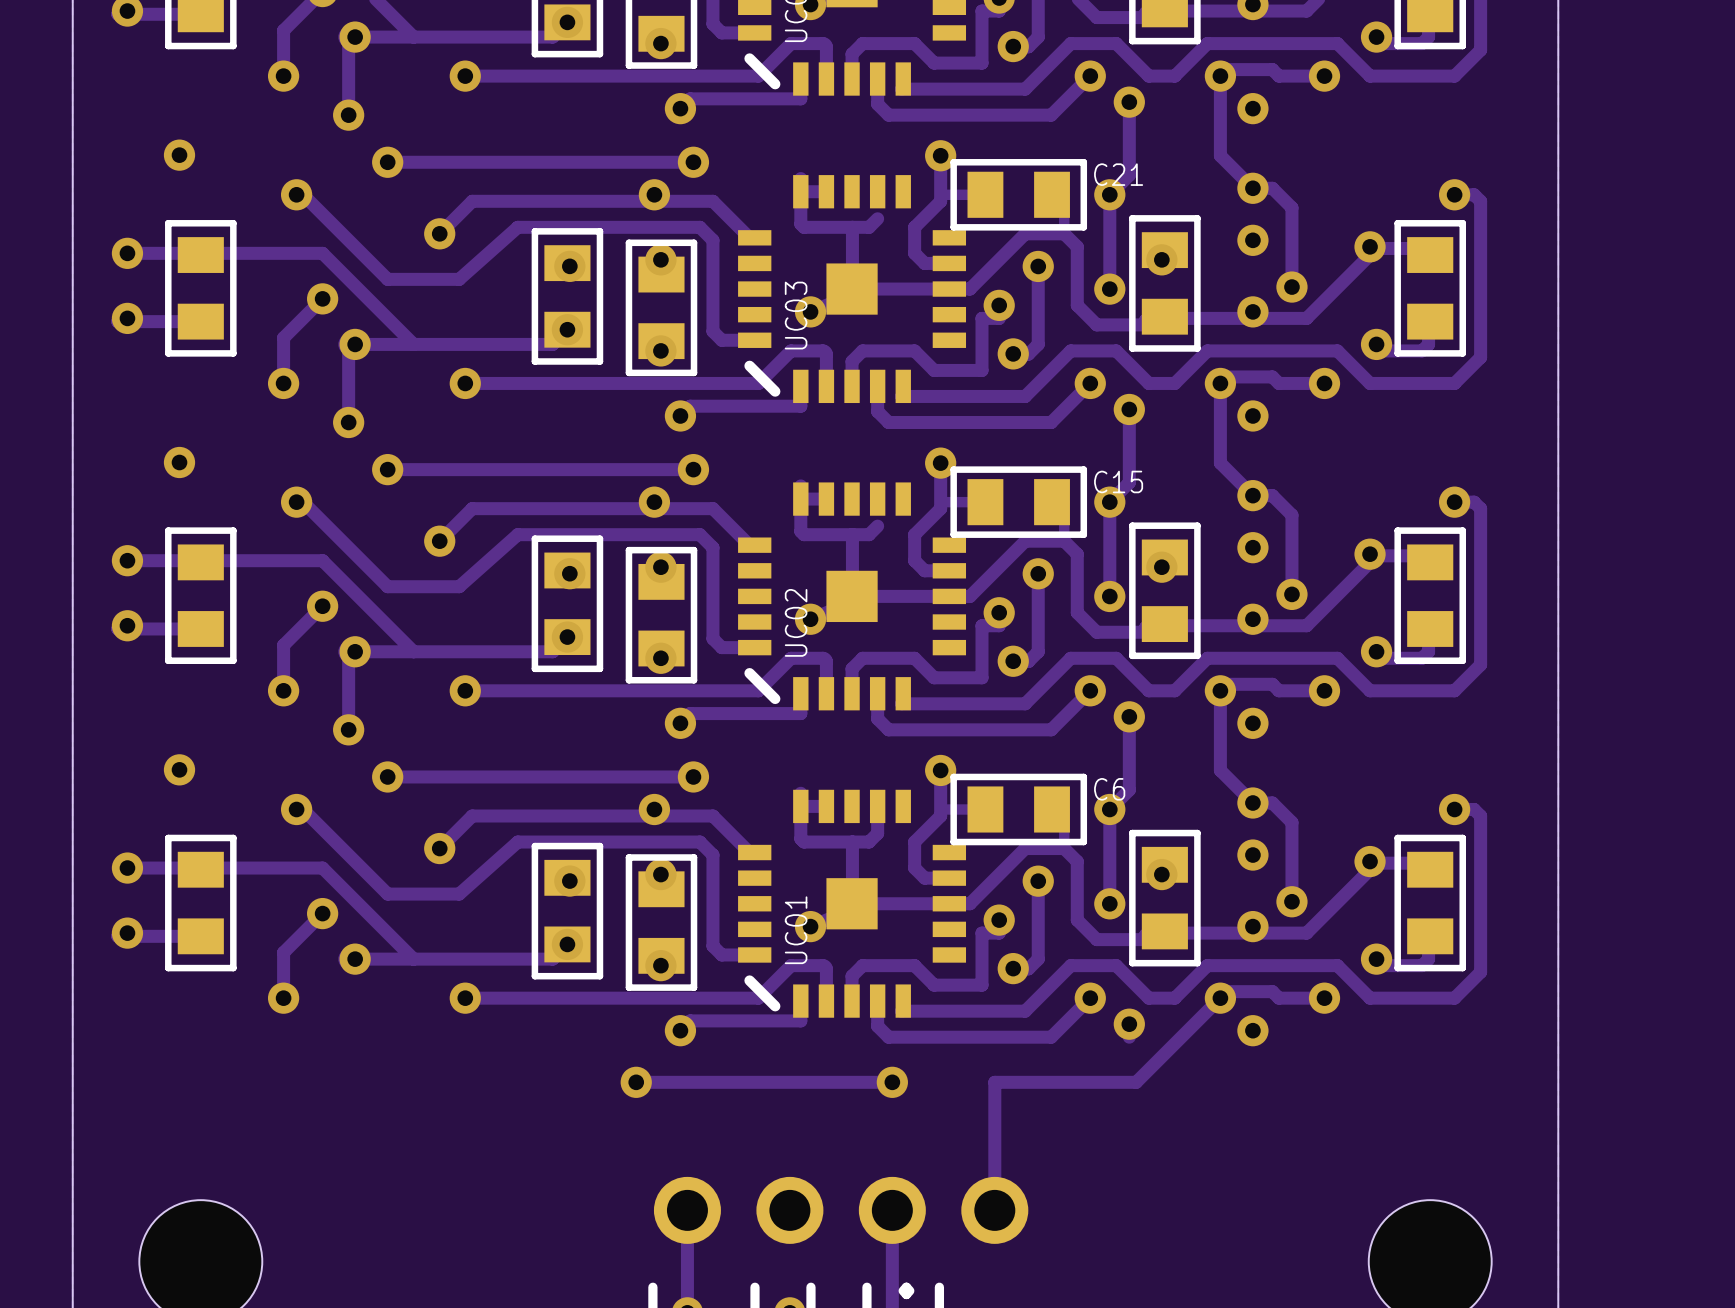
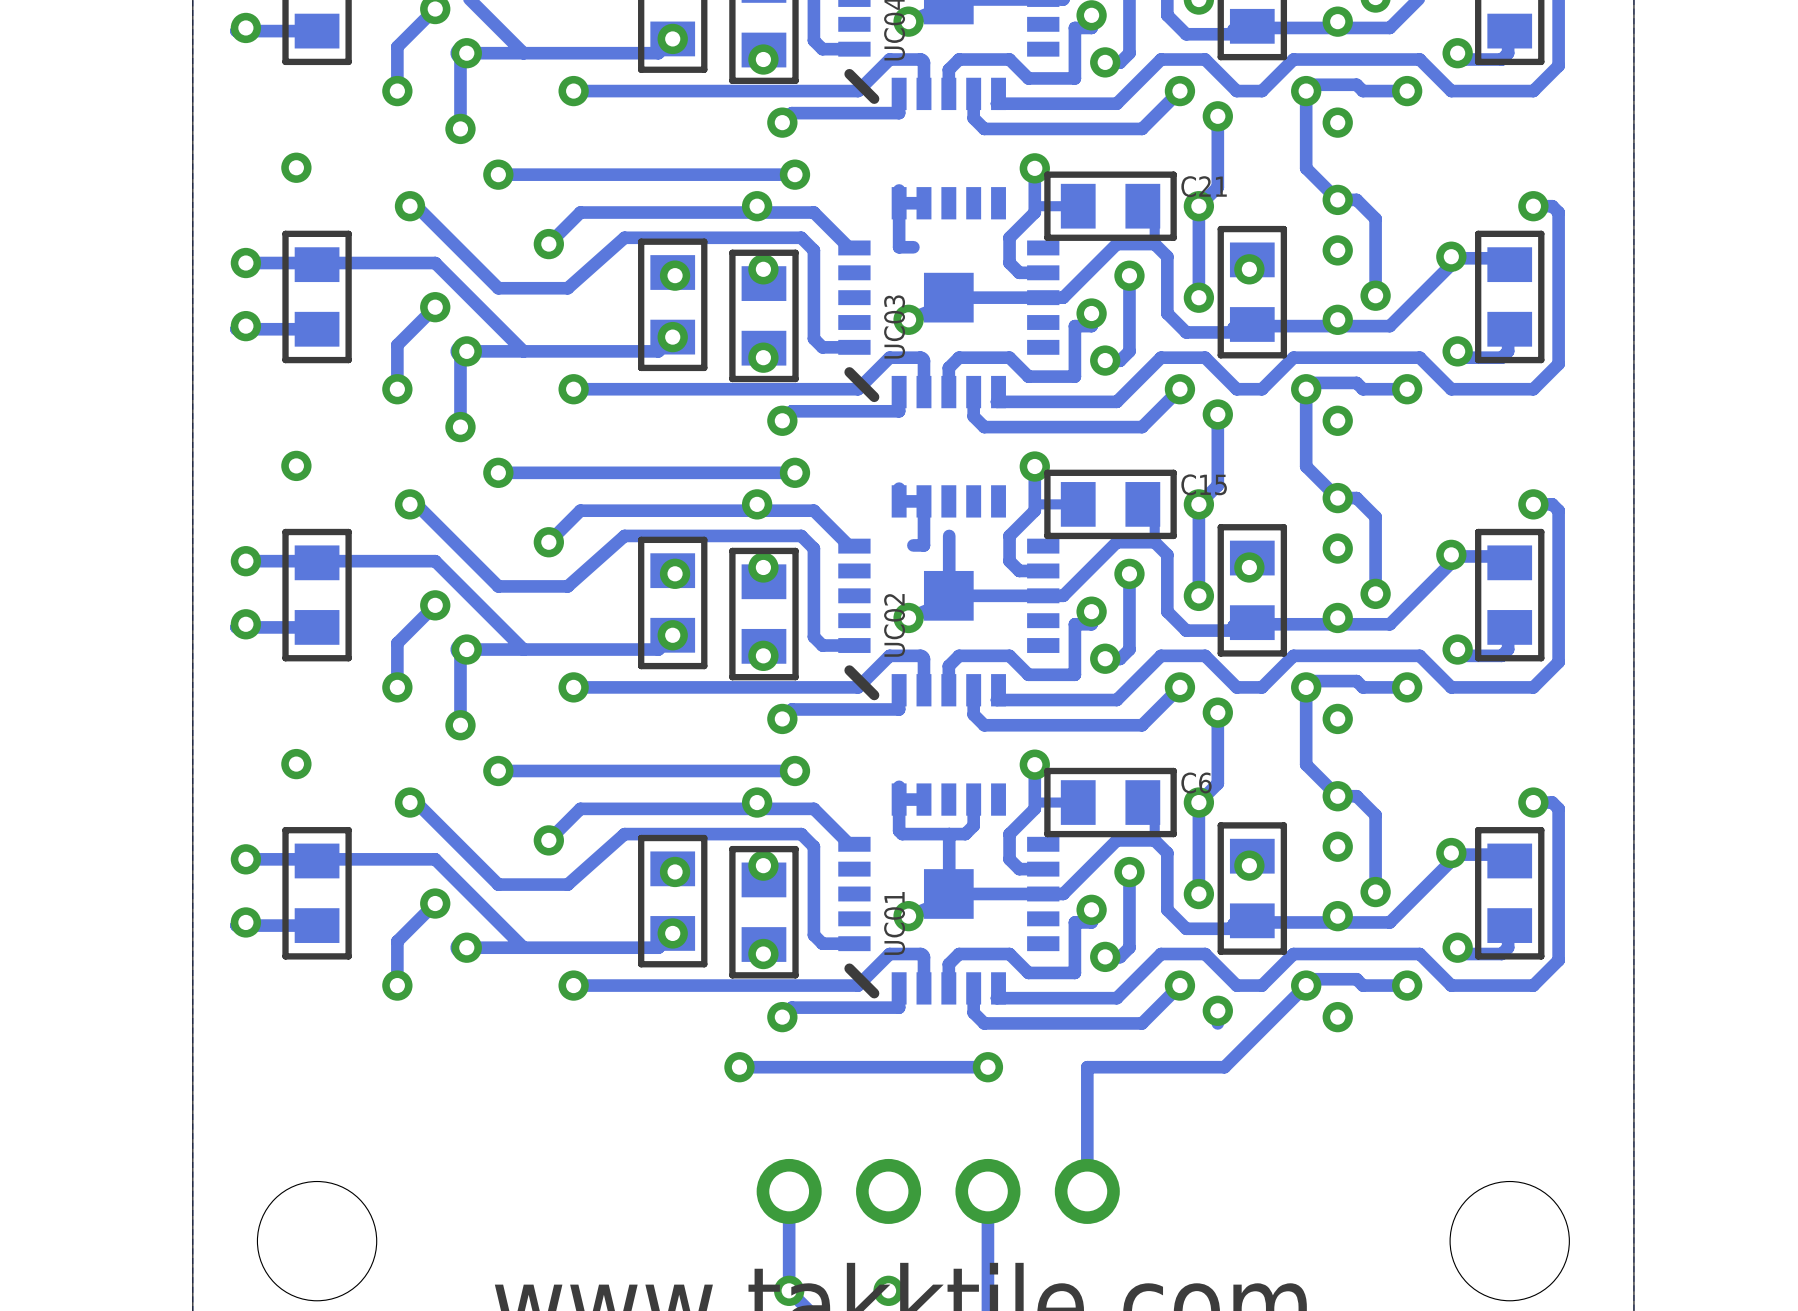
track: (877, 218) (869, 227) (804, 227) (800, 224) -> (913, 247) (899, 247) (899, 234)
track: (852, 227) (852, 276) -> none
track: (800, 499) (800, 531) (804, 534) (869, 534) (877, 526) -> none
track: none -> (923, 501) (923, 545) (913, 545)

